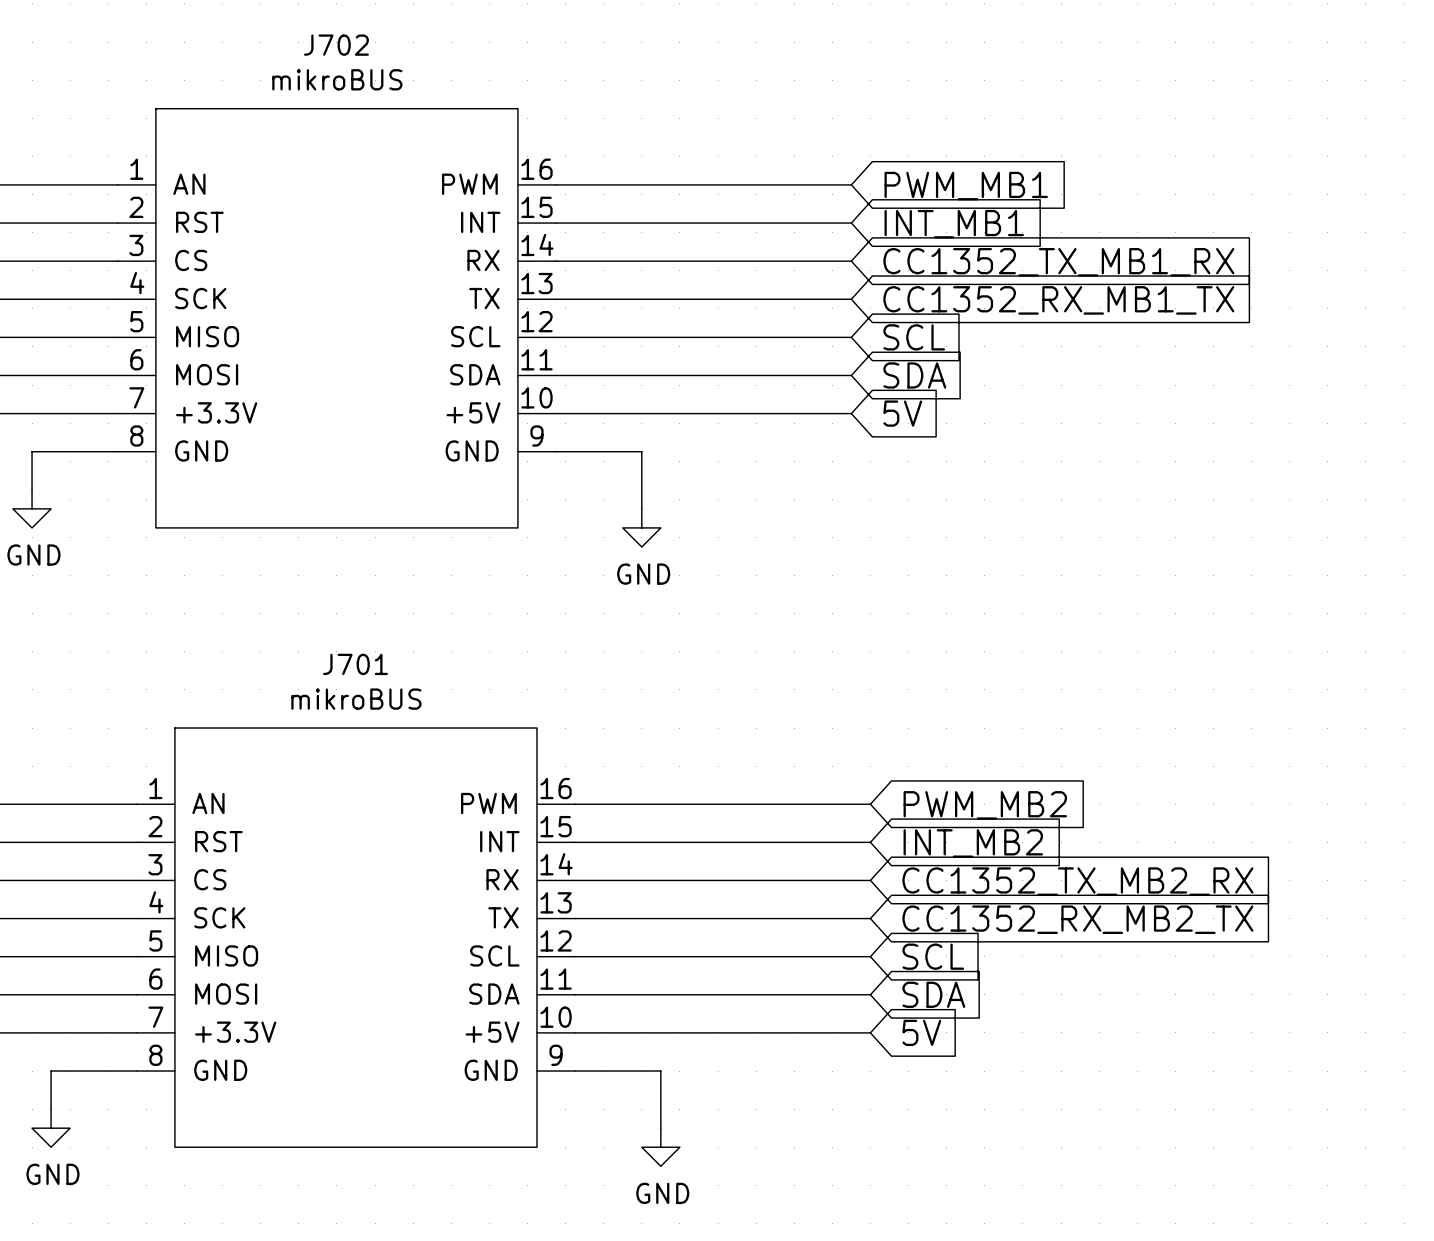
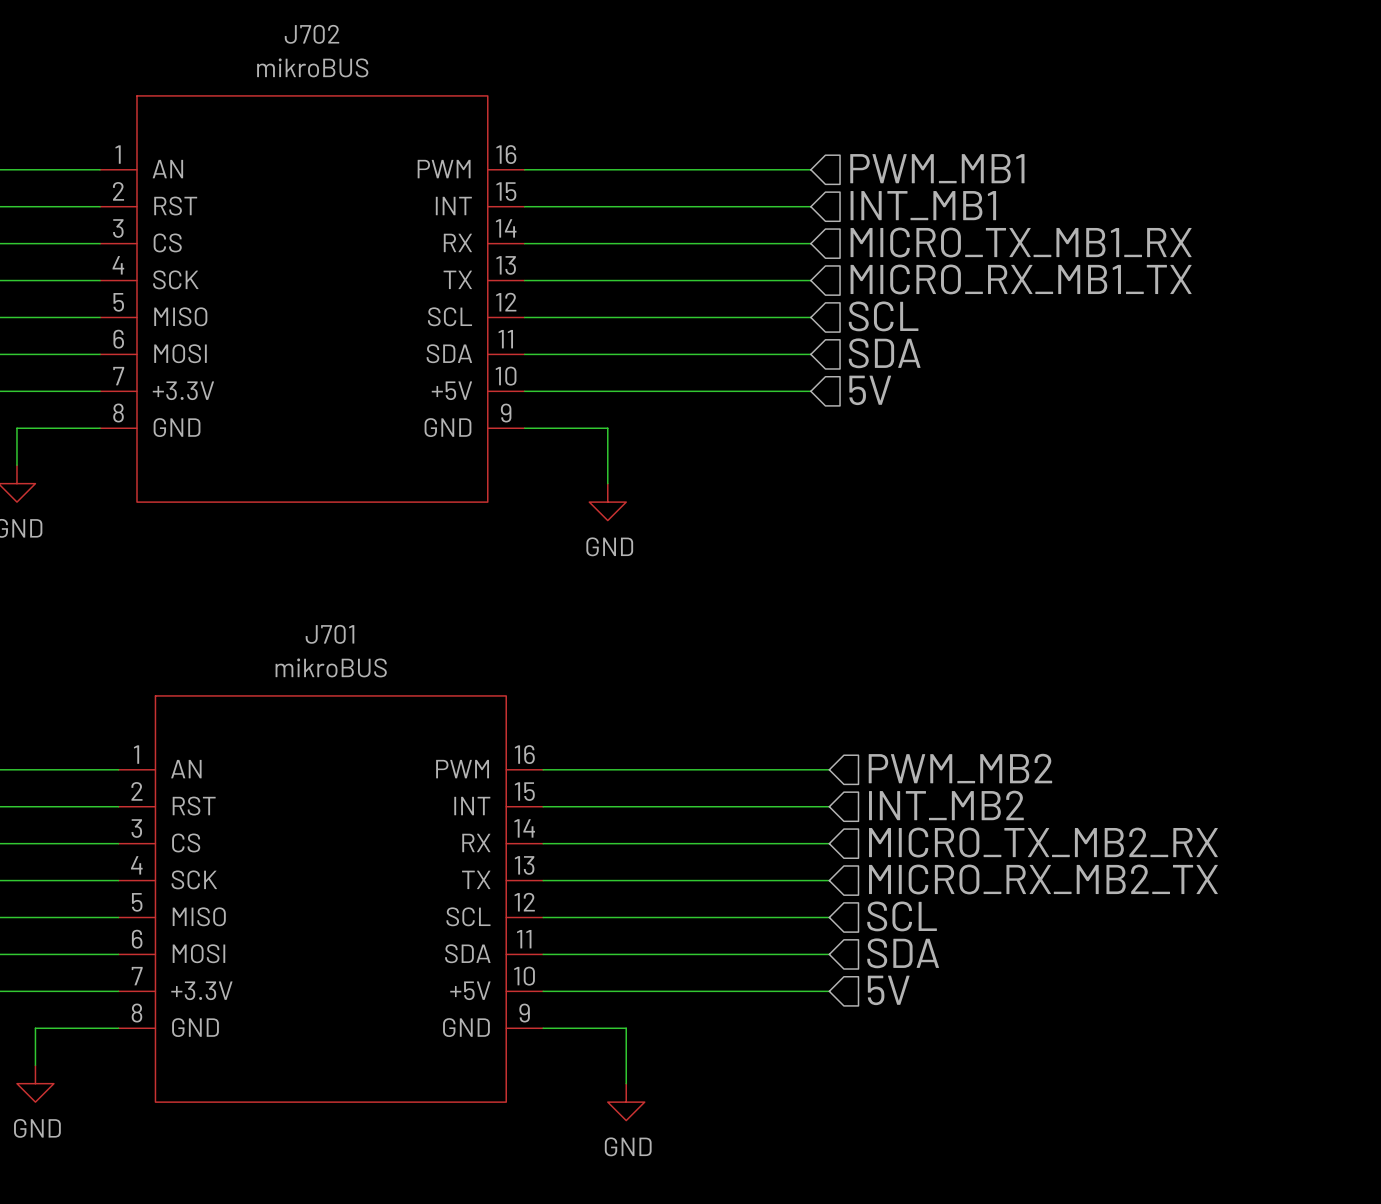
hierarchical label: none -> PWM_MB1 (937, 168)
global label: PWM_MB1 (966, 186) -> none
hierarchical label: none -> INT_MB1 (923, 205)
global label: INT_MB1 (954, 224) -> none
hierarchical label: none -> MICRO_TX_MB1_RX (1021, 242)
global label: CC1352_TX_MB1_RX (1058, 262) -> none
hierarchical label: none -> MICRO_RX_MB1_TX (1021, 279)
global label: CC1352_RX_MB1_TX (1058, 300) -> none
hierarchical label: none -> SCL (883, 316)
global label: SCL (914, 337) -> none
hierarchical label: none -> SDA (884, 353)
global label: SDA (914, 375) -> none
hierarchical label: none -> 5V (870, 390)
global label: 5V (902, 413) -> none
hierarchical label: none -> PWM_MB2 (960, 768)
global label: PWM_MB2 (985, 805) -> none
hierarchical label: none -> INT_MB2 (946, 805)
global label: INT_MB2 (973, 843) -> none
hierarchical label: none -> MICRO_TX_MB2_RX (1043, 842)
global label: CC1352_TX_MB2_RX (1077, 881) -> none
hierarchical label: none -> MICRO_RX_MB2_TX (1043, 879)
global label: CC1352_RX_MB2_TX (1077, 919) -> none
hierarchical label: none -> SCL (902, 916)
global label: SCL (933, 956) -> none
hierarchical label: none -> SDA (903, 953)
global label: SDA (933, 994) -> none
hierarchical label: none -> 5V (888, 990)
global label: 5V (921, 1032) -> none

